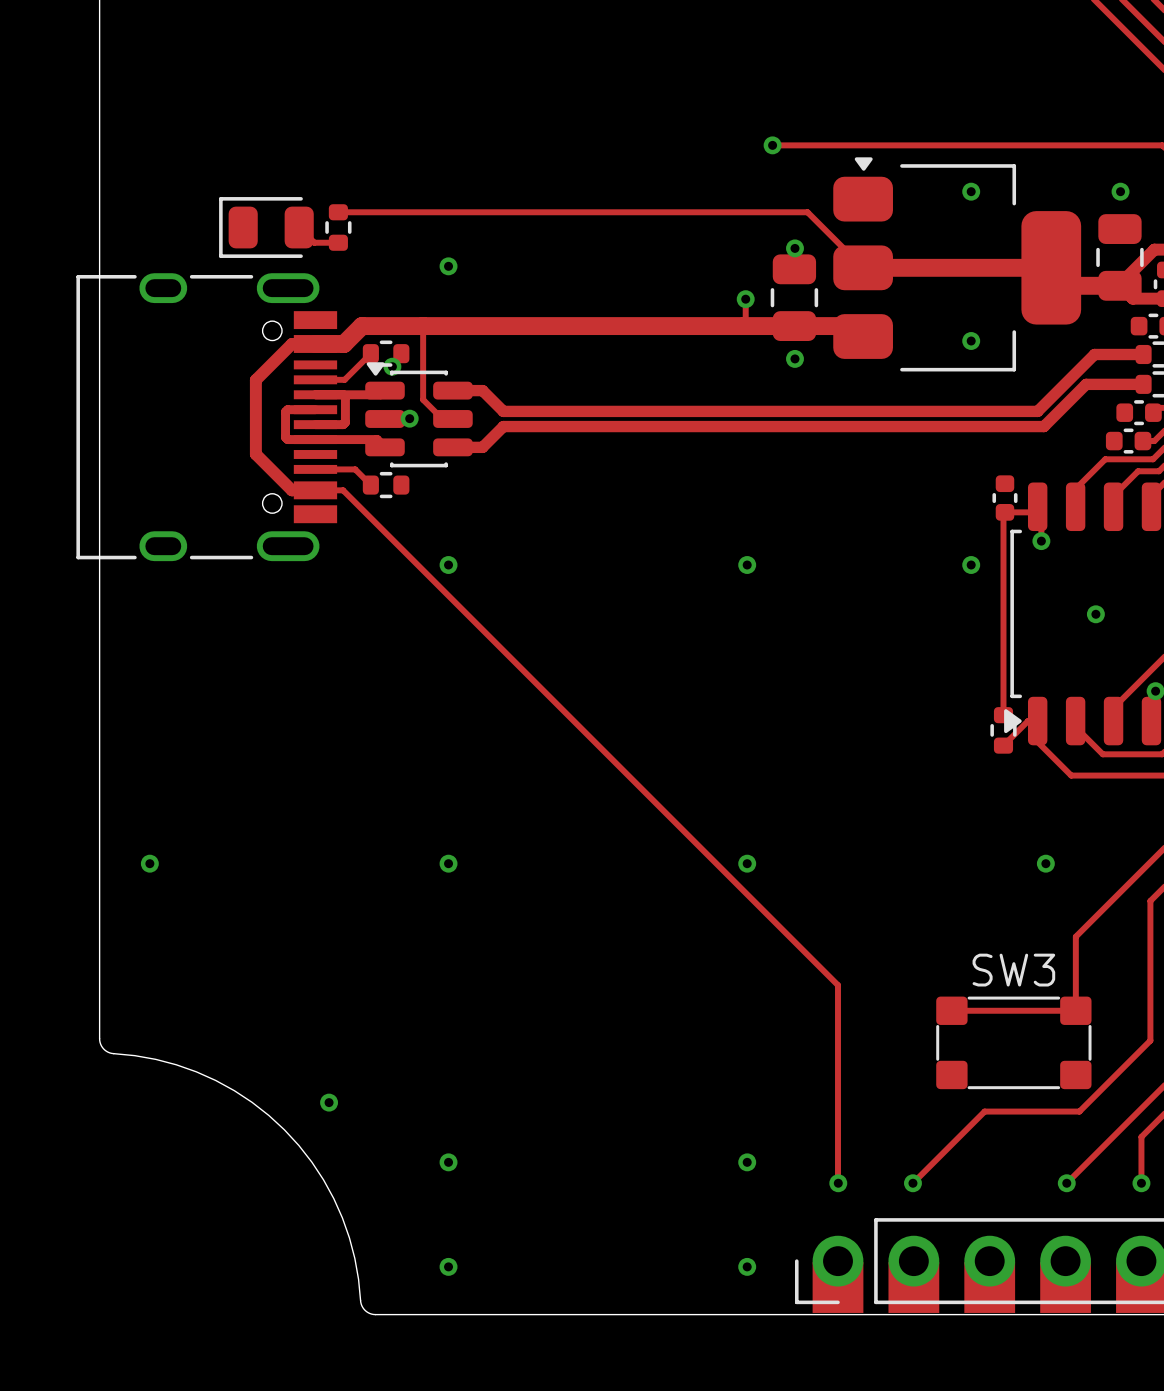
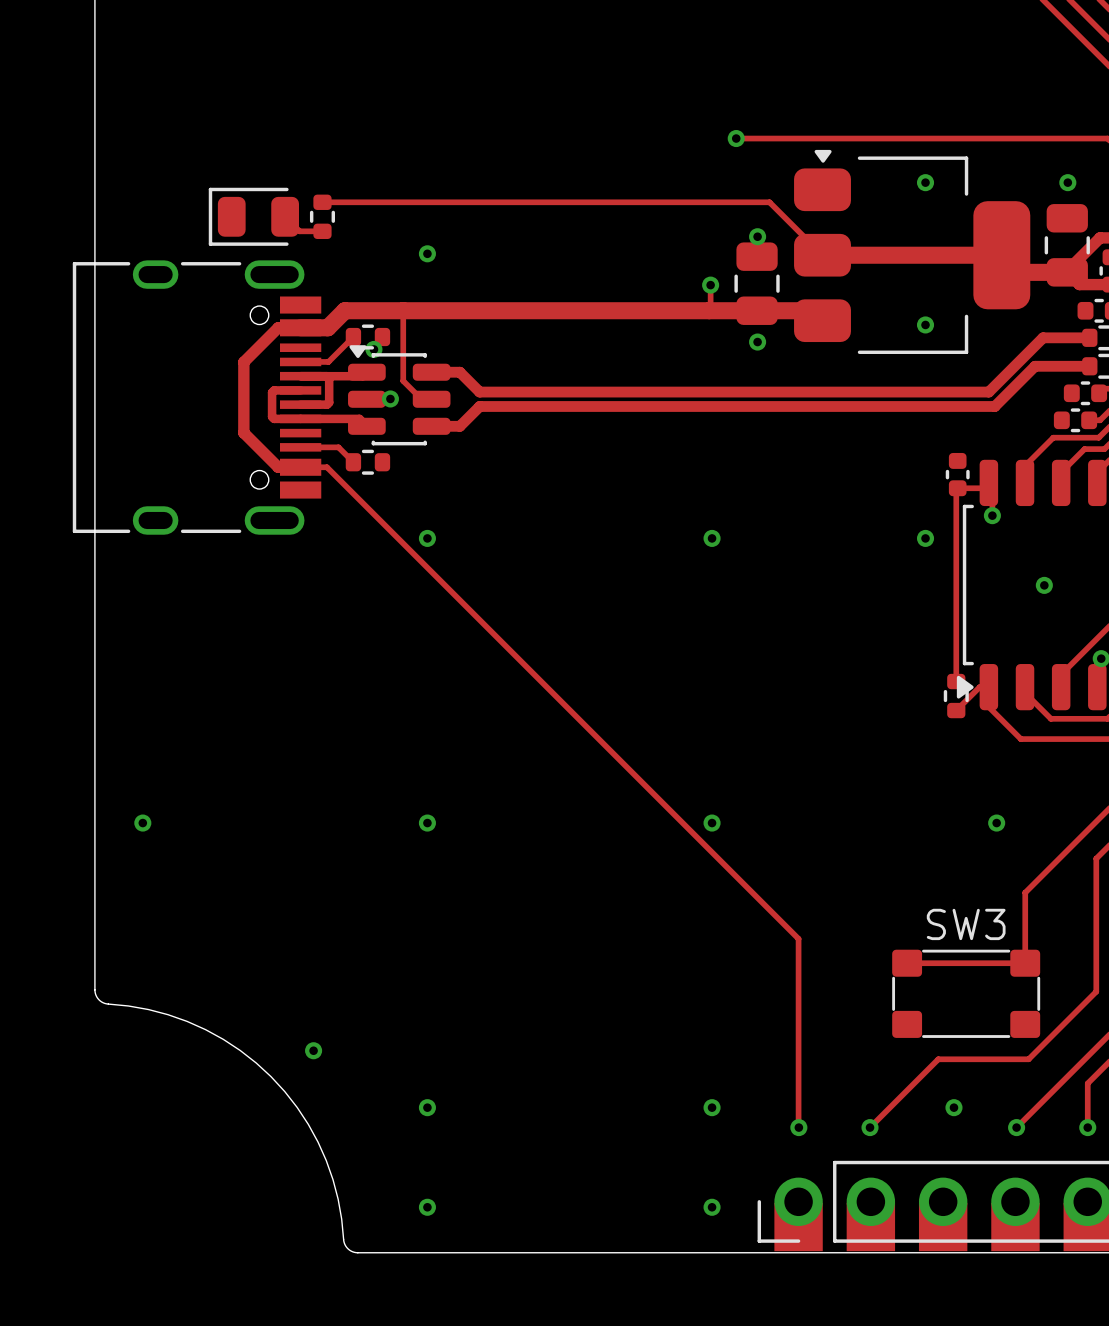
via: none -> (953, 1107)

